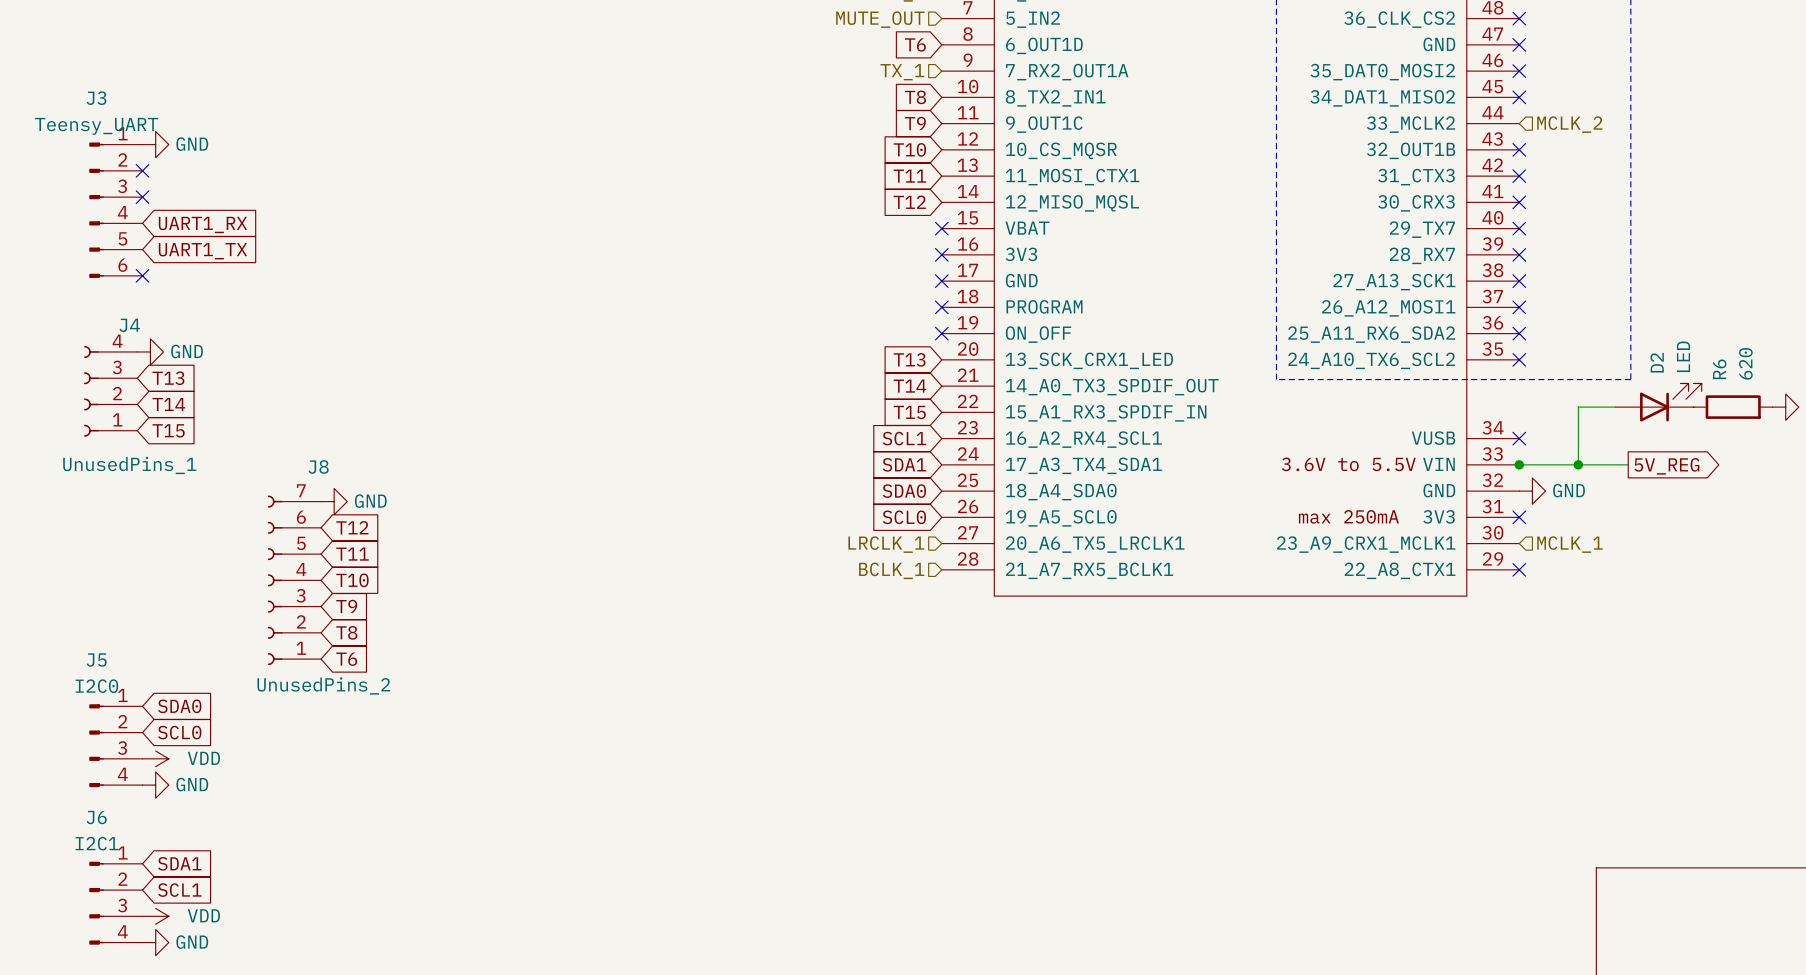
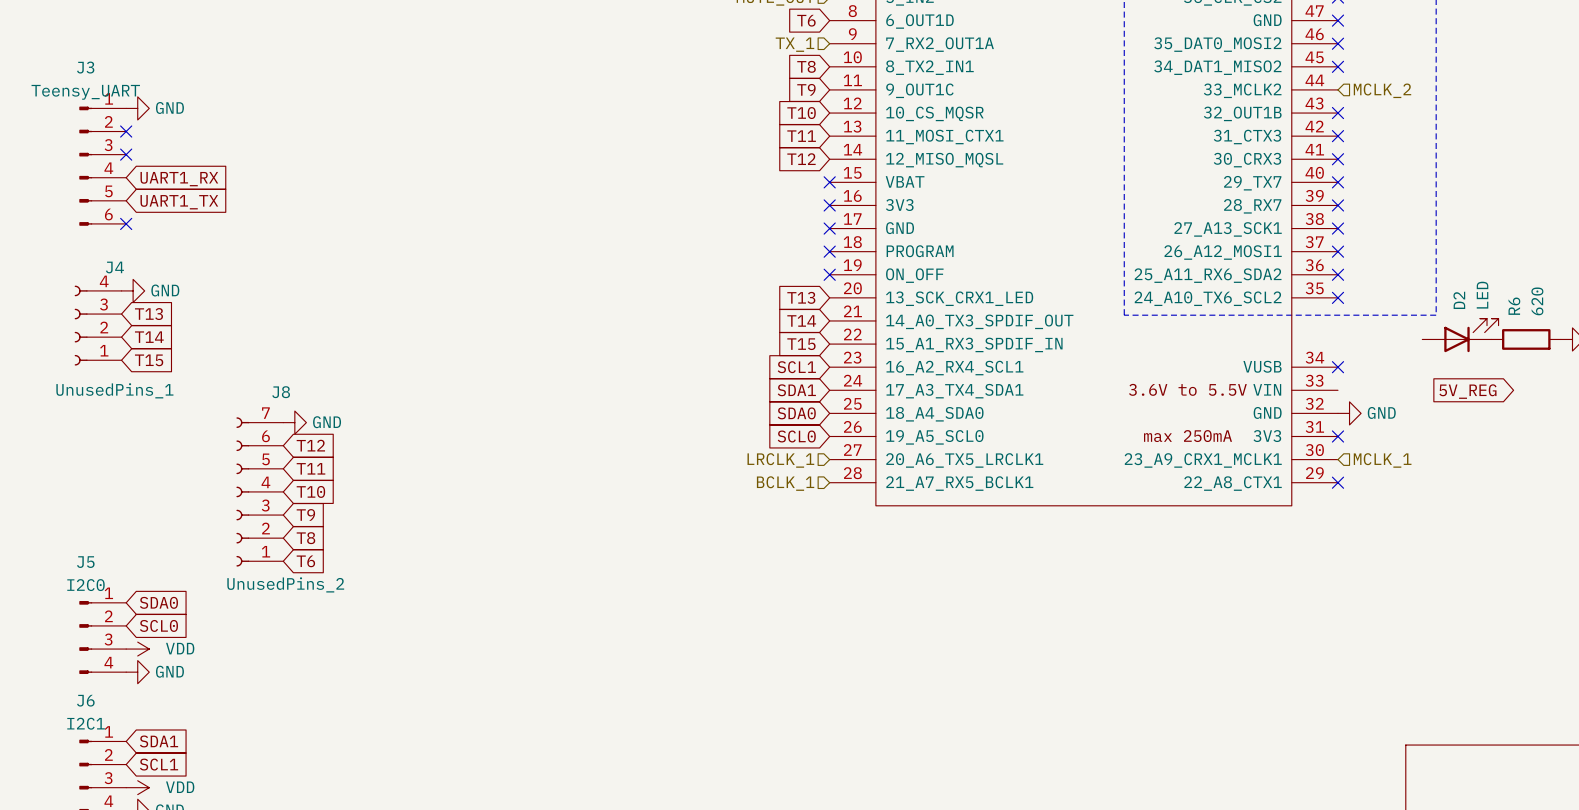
wire: (1615, 407) (1578, 407) (1578, 464) -> none
wire: (1517, 464) (1628, 464) -> none
junction: (1519, 464) -> none
junction: (1578, 464) -> none

